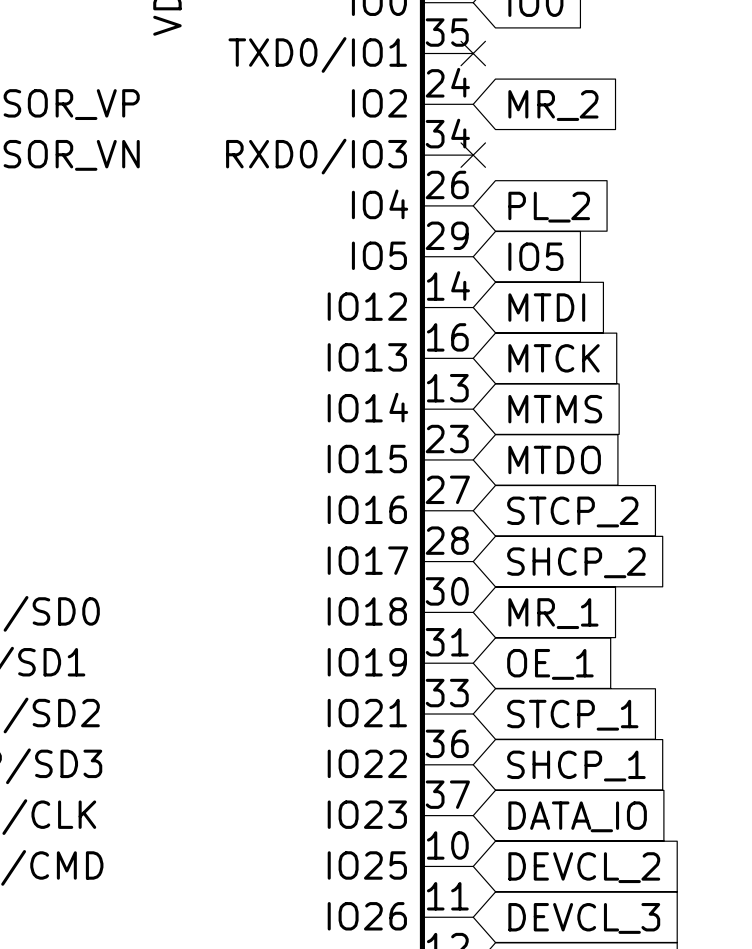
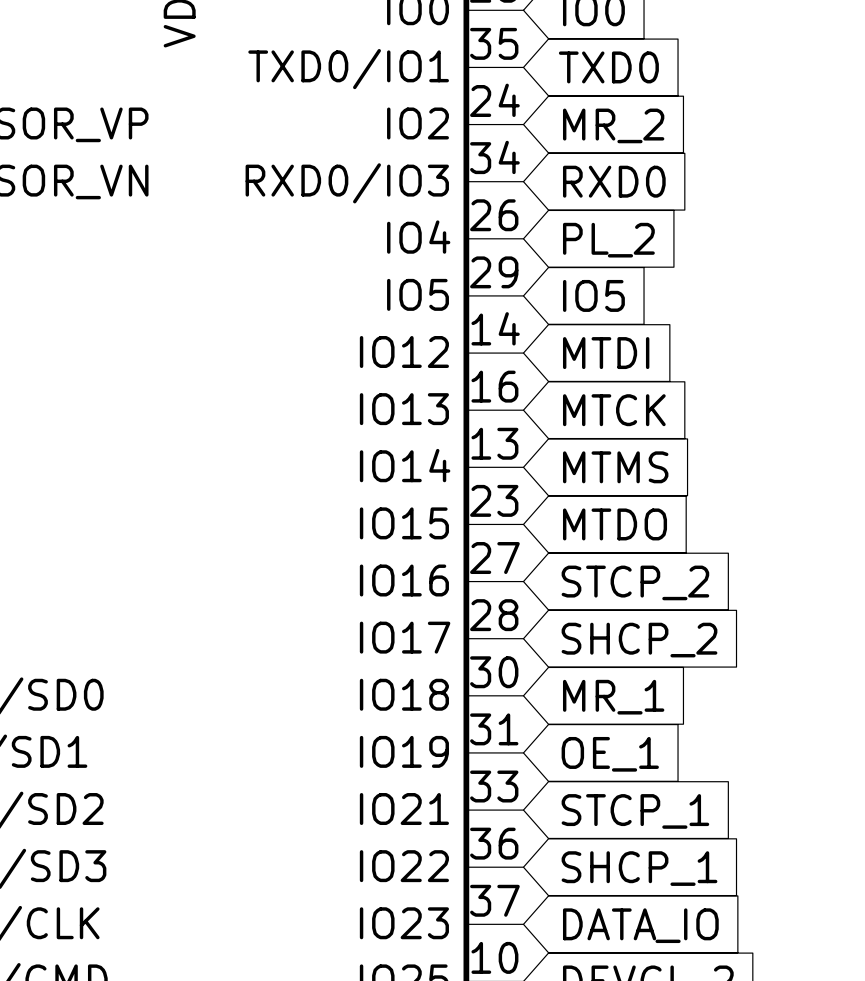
no-connect mark: (473, 53) -> none
global label: none -> TXD0 (608, 67)
no-connect mark: (473, 155) -> none
global label: none -> RXD0 (614, 181)

